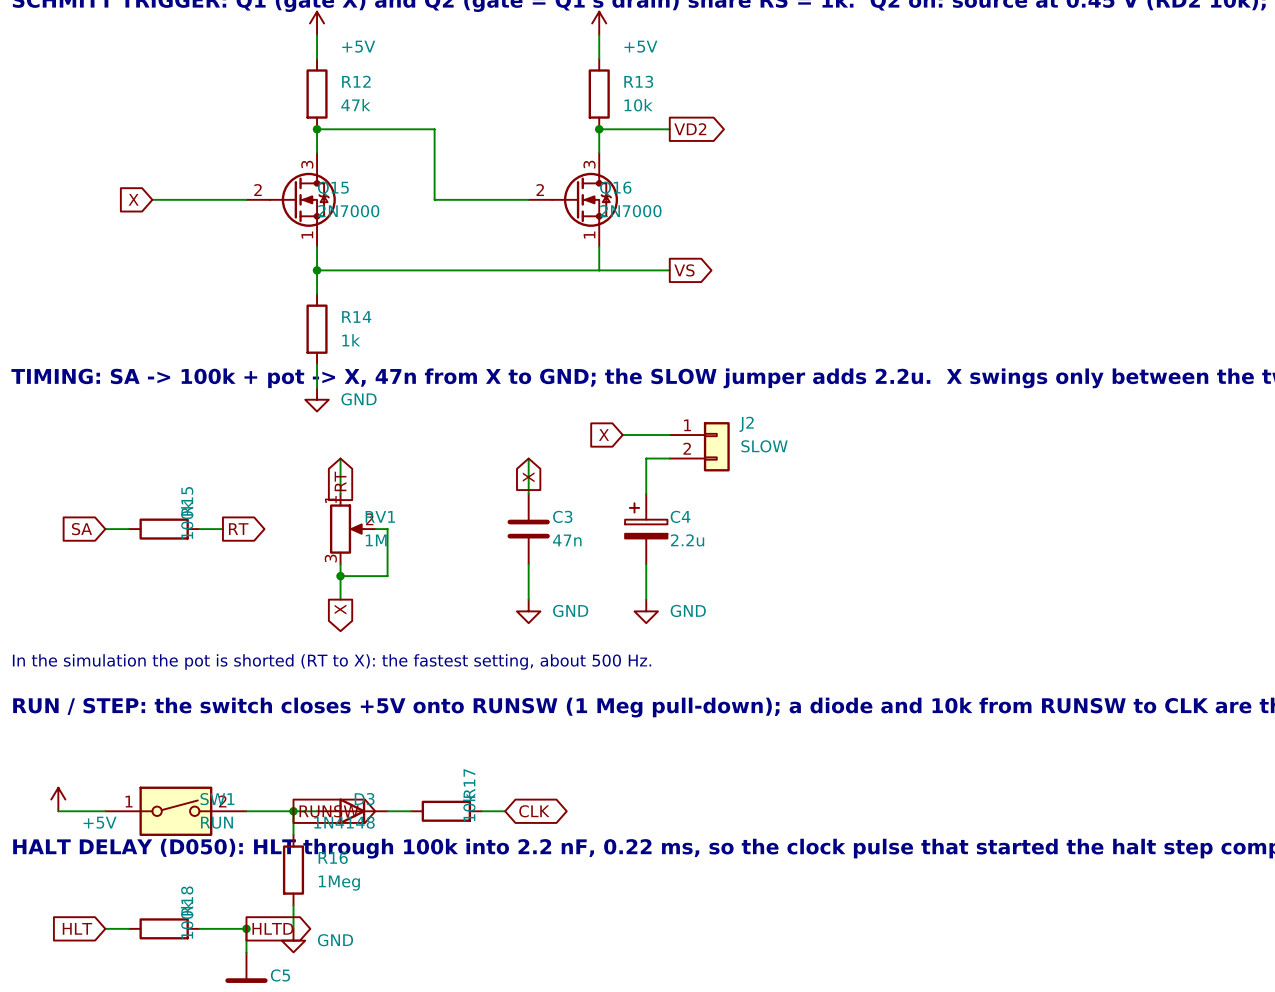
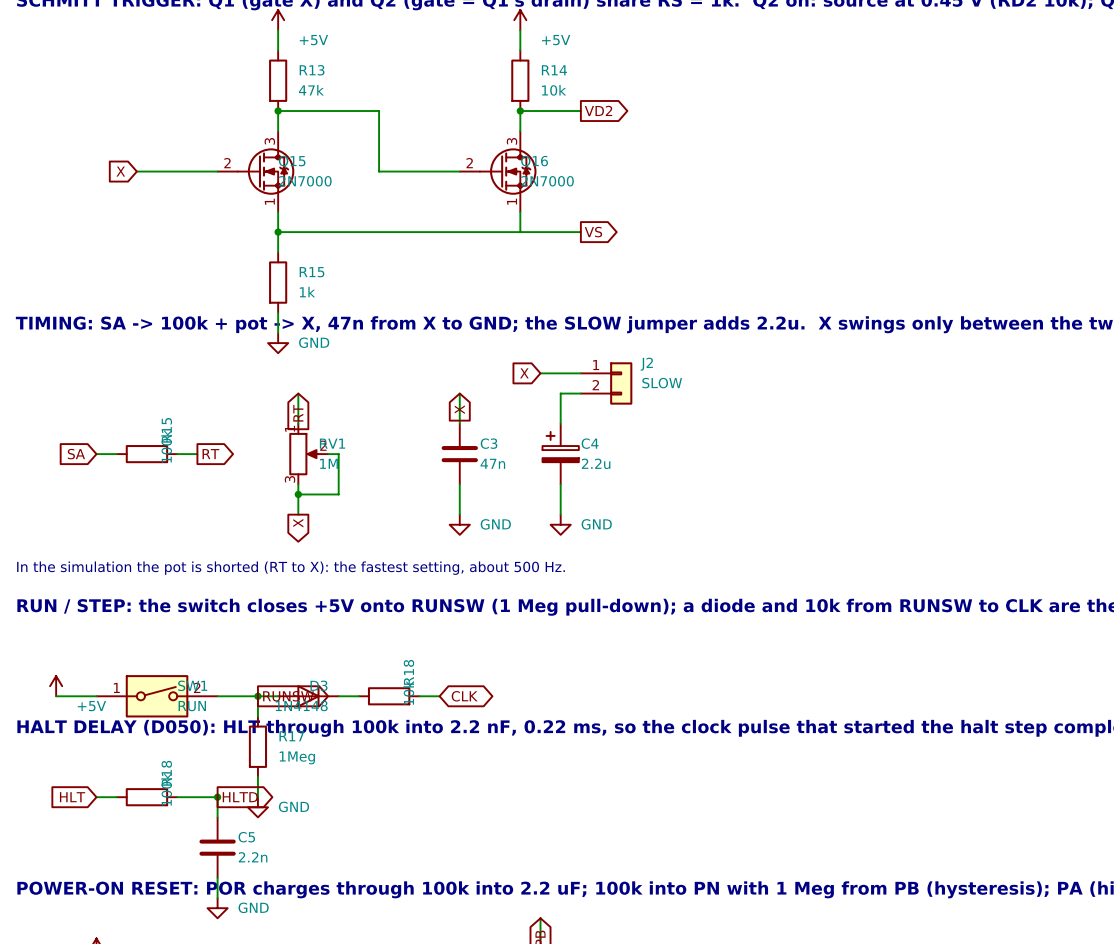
R12 name: R12 (356, 81) -> R13 (312, 70)
R13 name: R13 (638, 81) -> R14 (554, 70)
R14 name: R14 (356, 316) -> R15 (312, 272)
R17 name: R17 (469, 783) -> R18 (408, 672)
R16 name: R16 (333, 857) -> R17 (291, 736)

